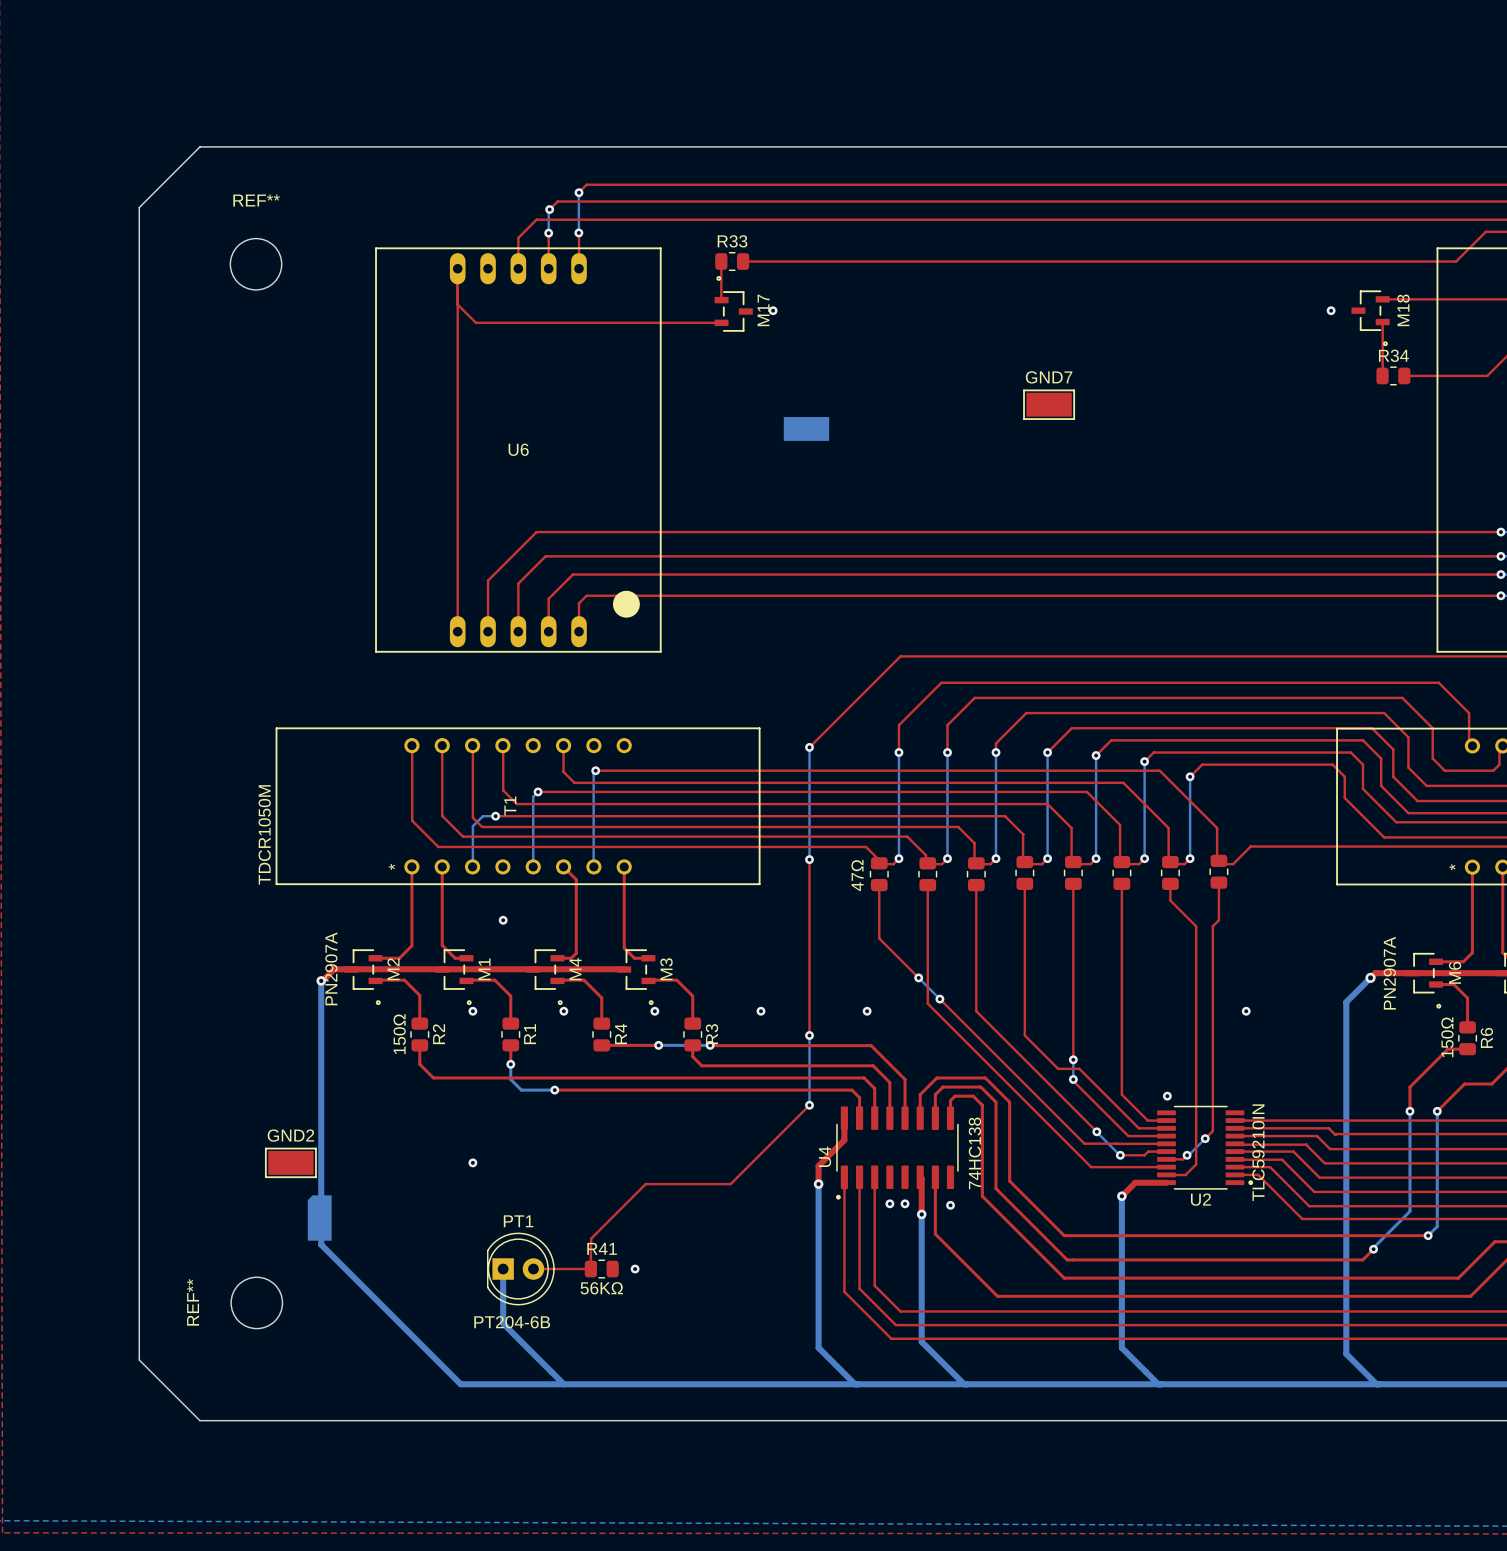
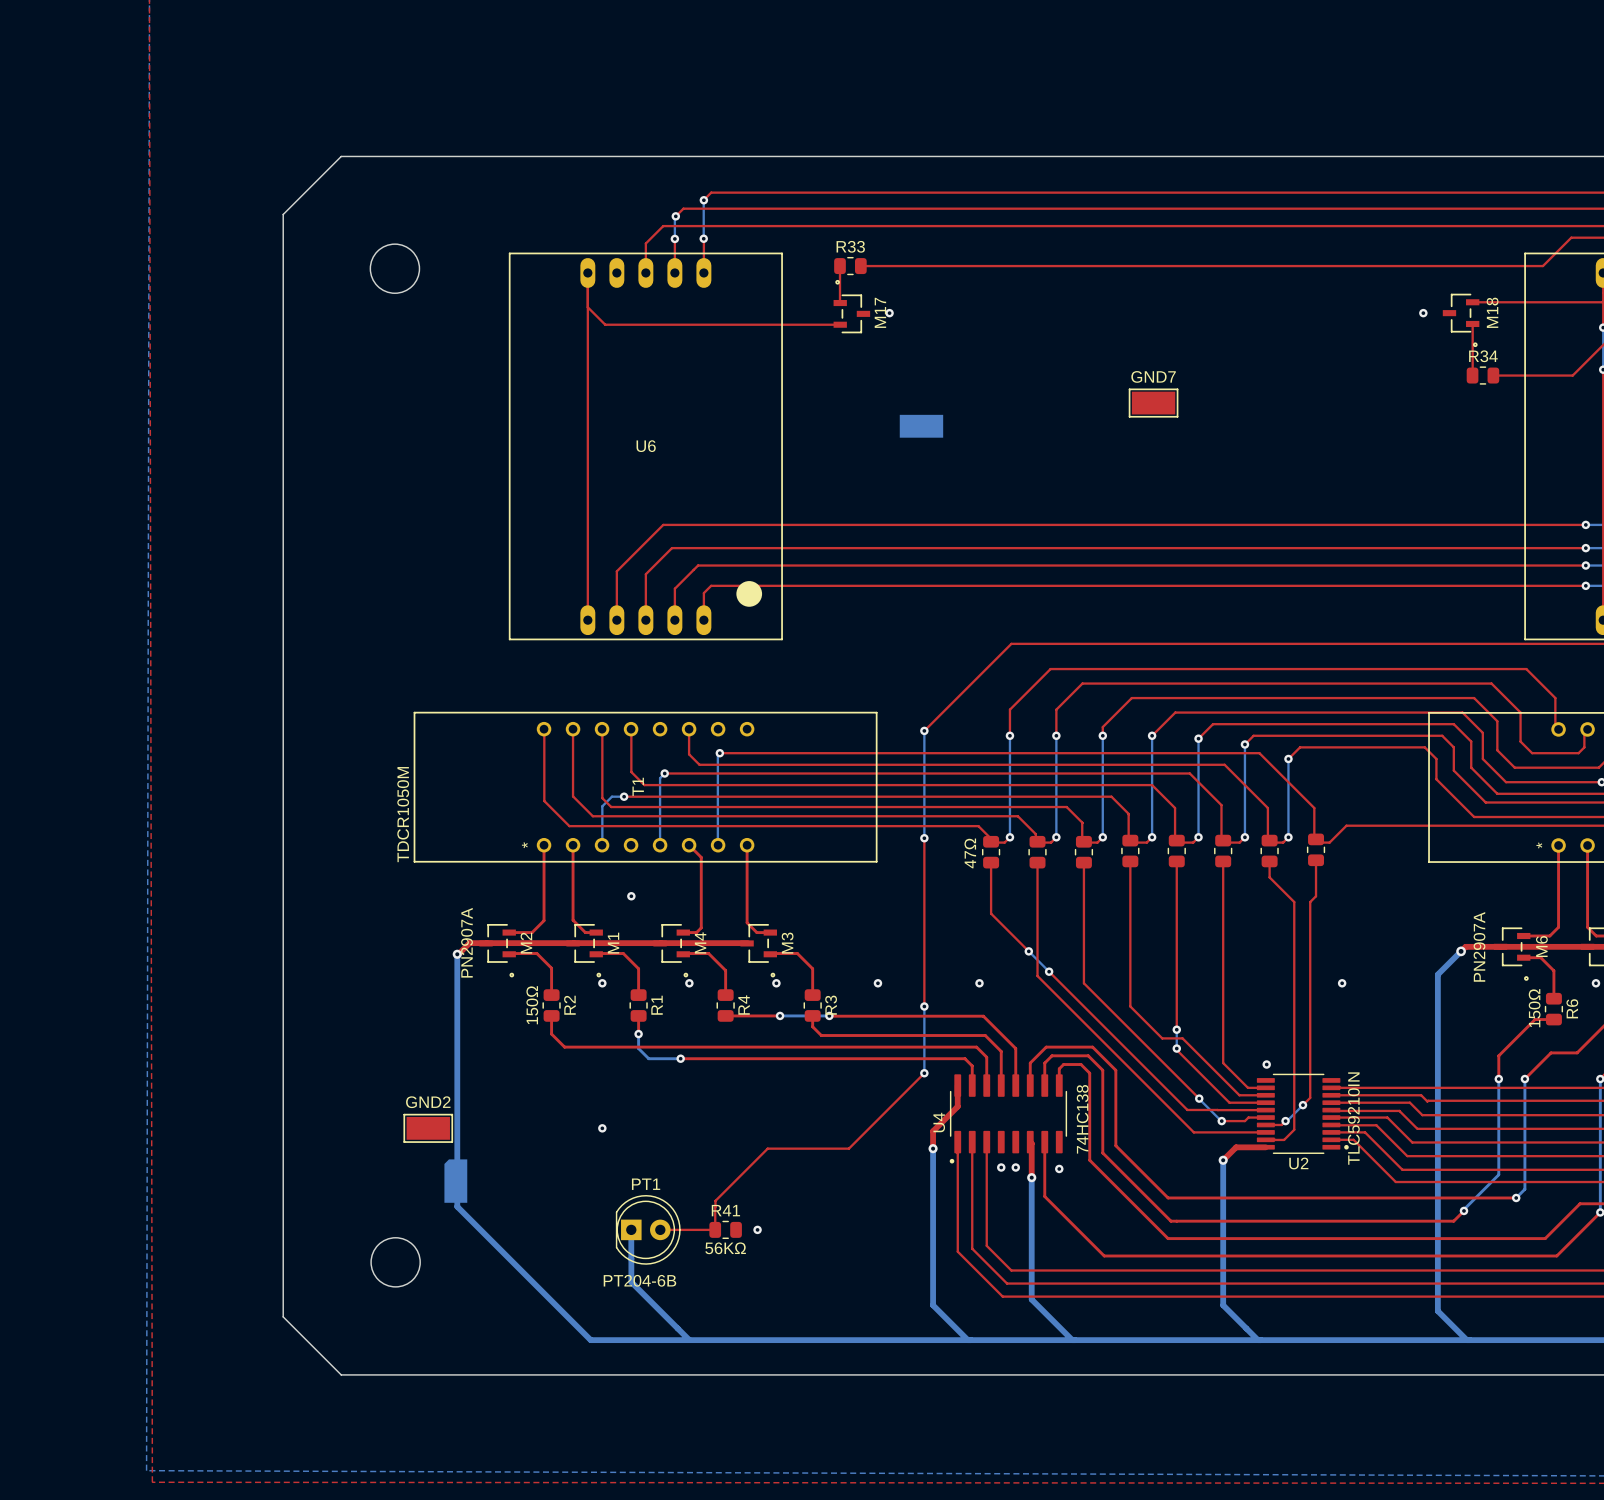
REF** name: REF** (256, 200) -> none
REF** name: REF** (193, 1302) -> none

